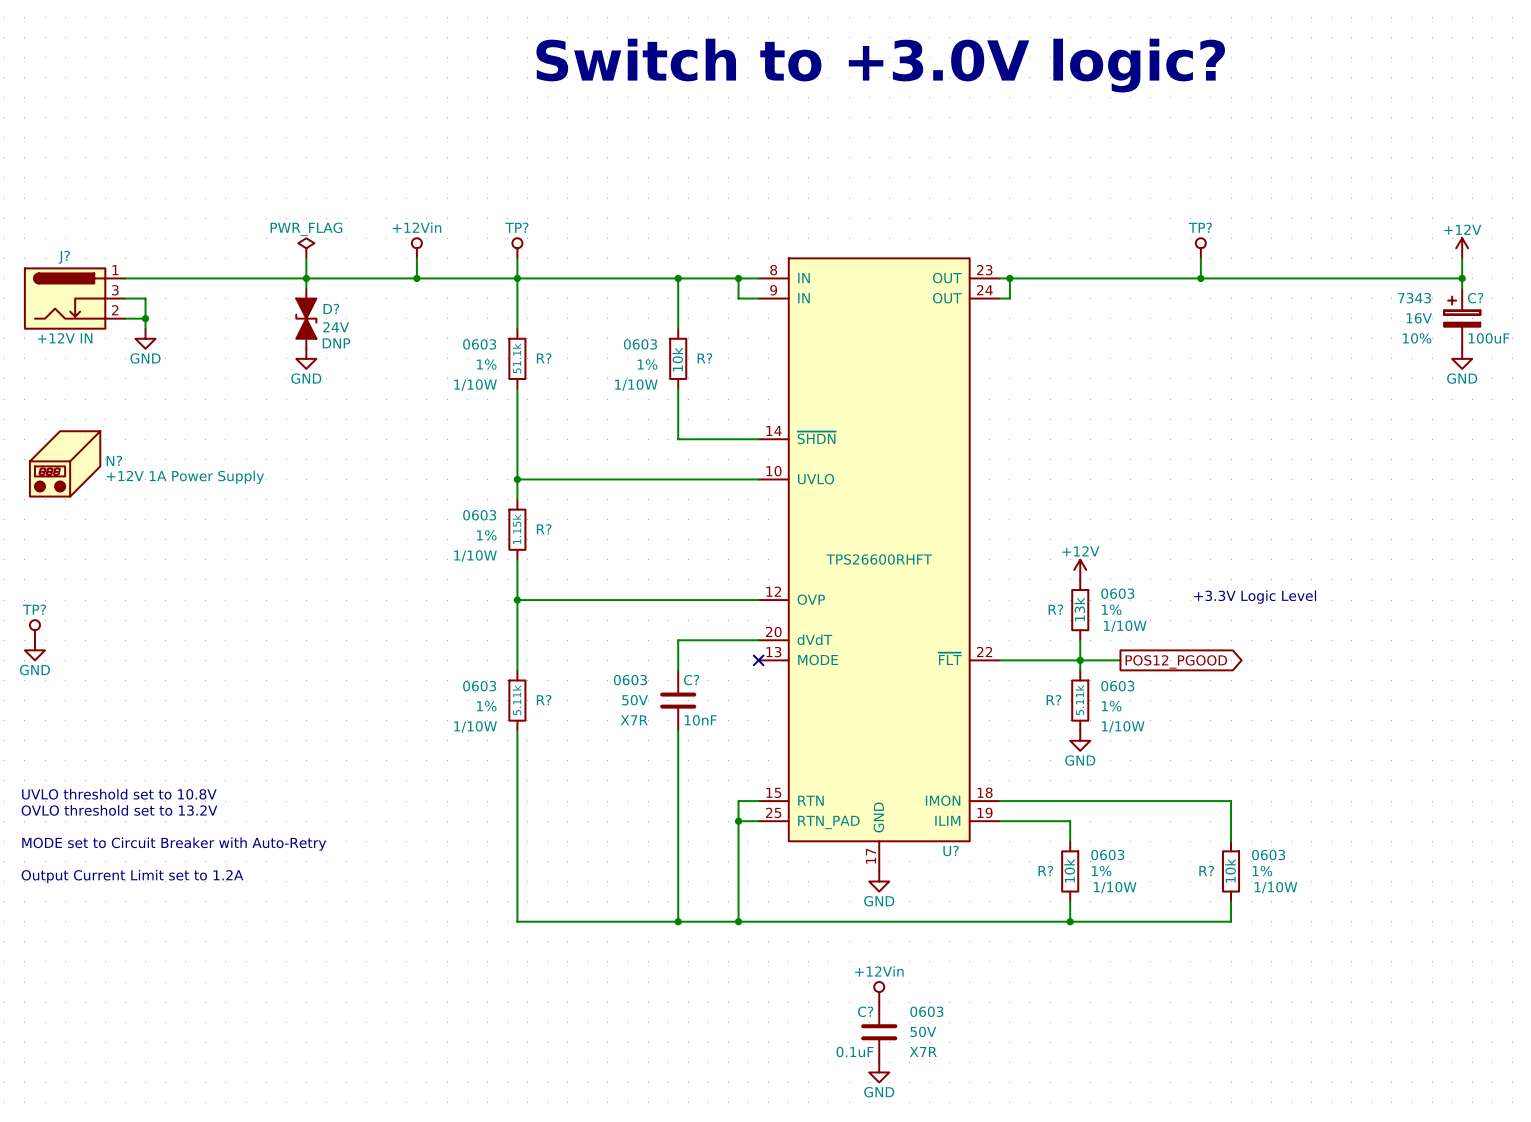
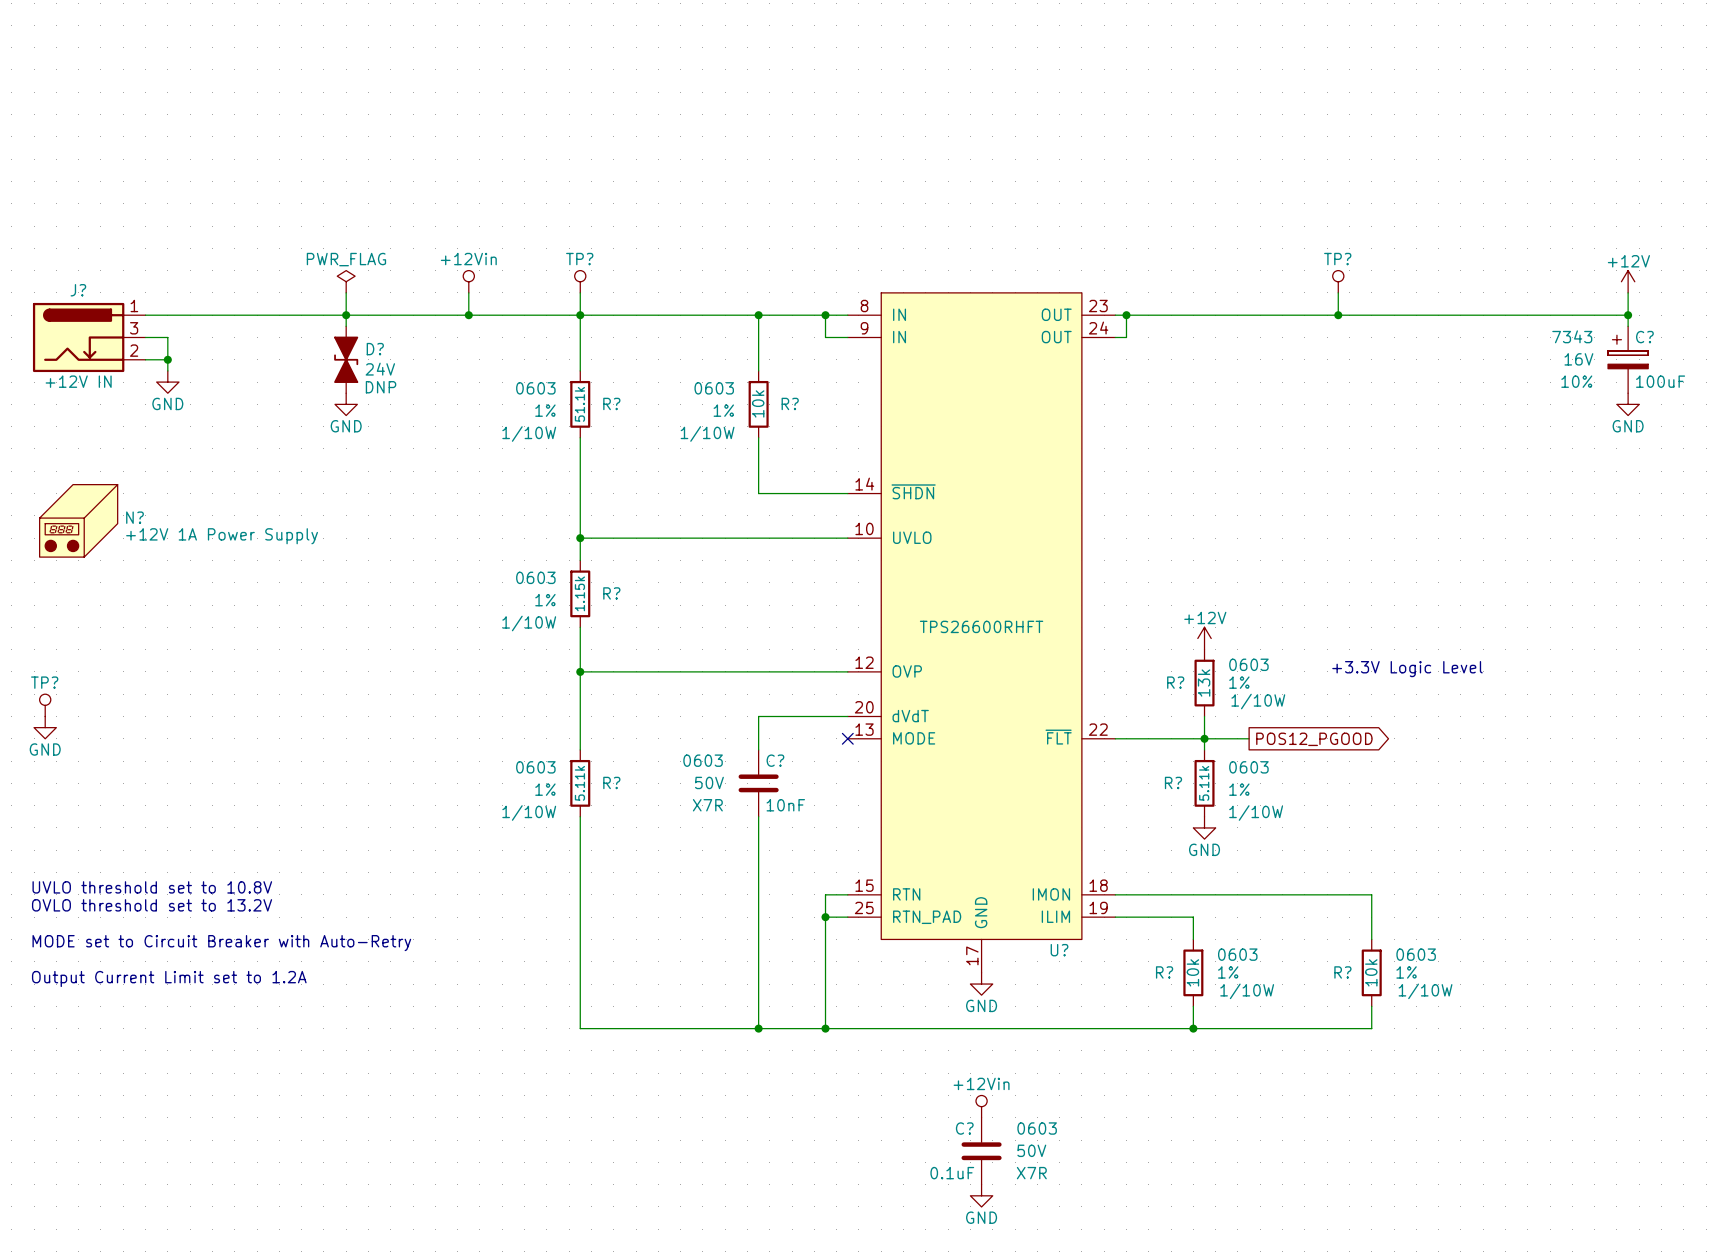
text: Switch to +3.0V logic? (880, 65) -> none

